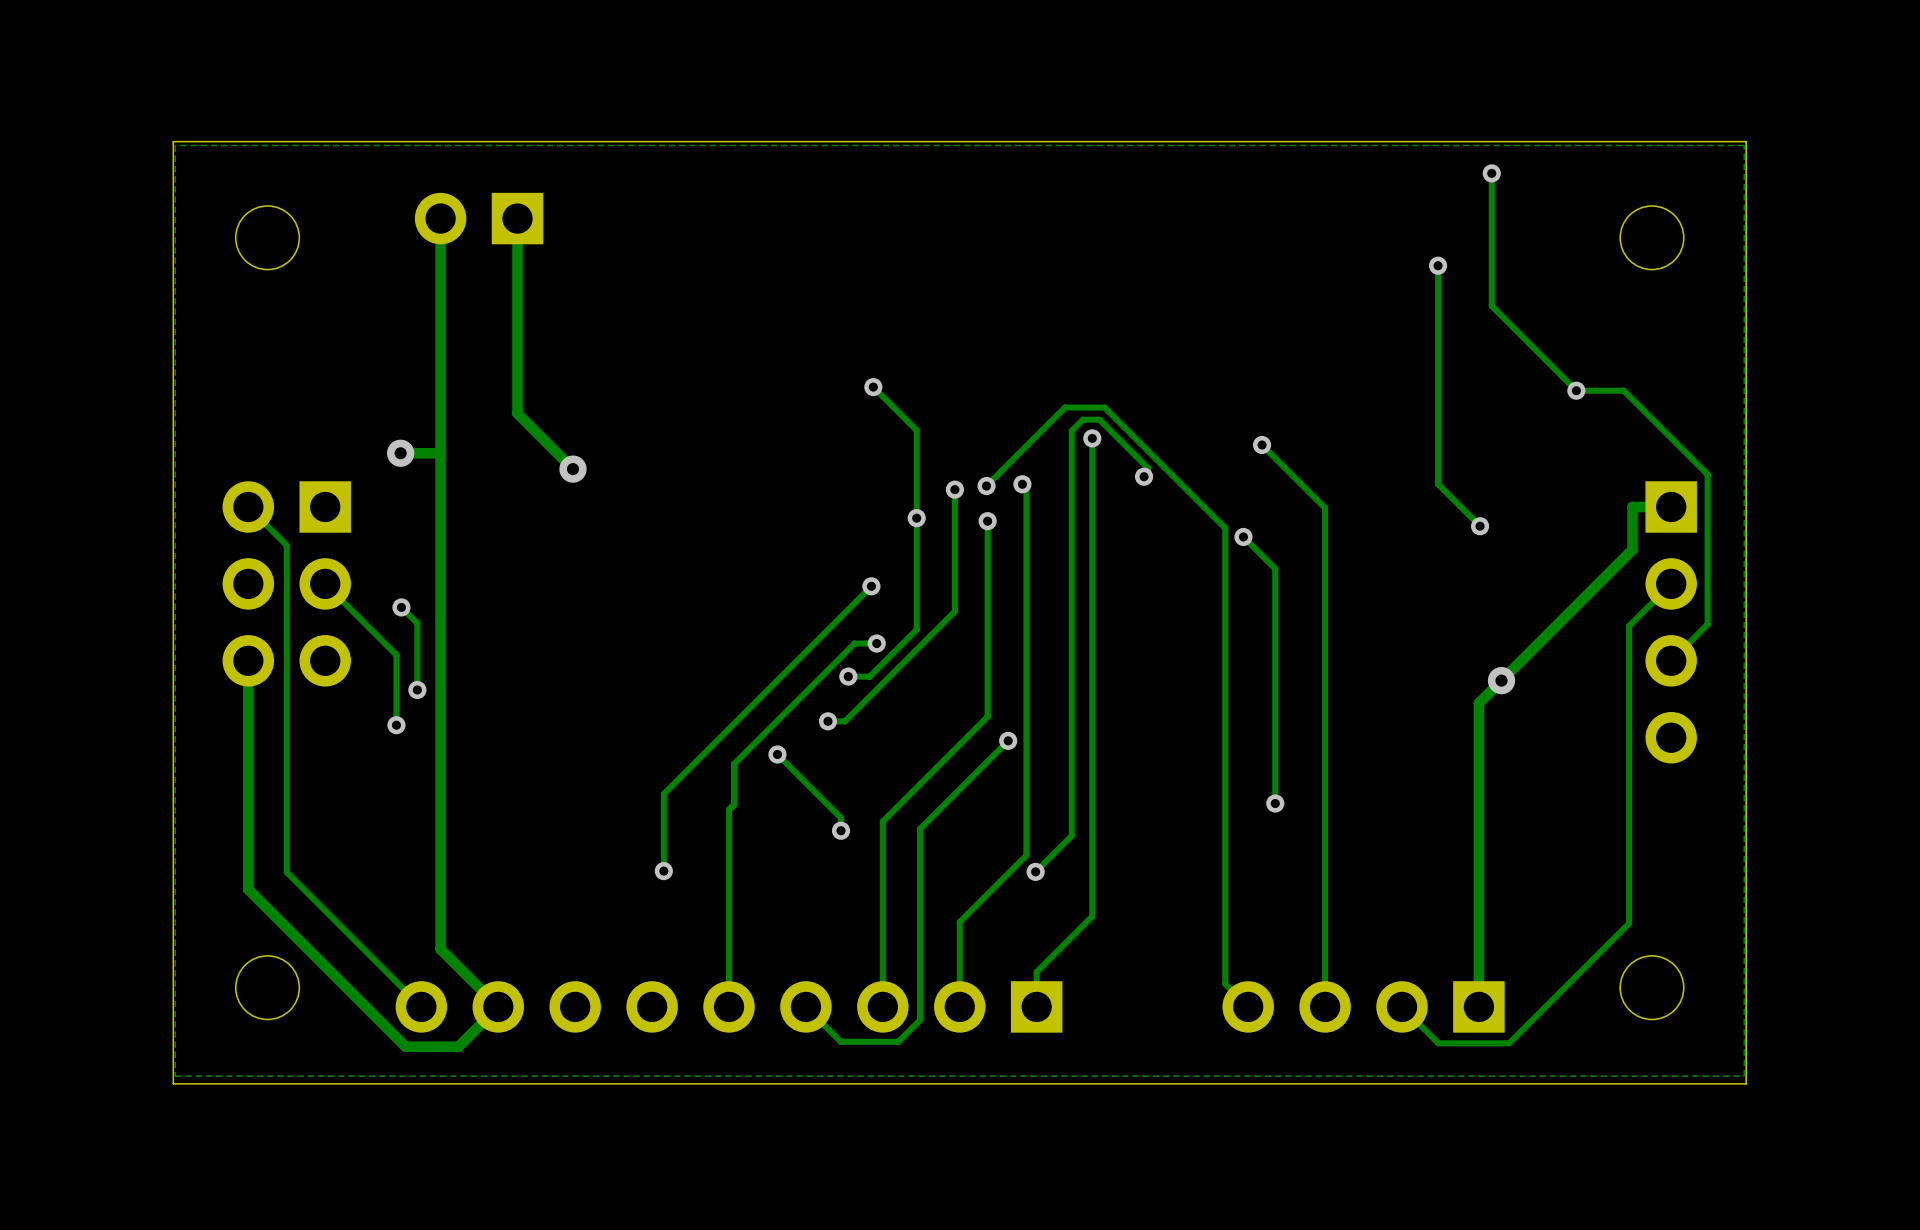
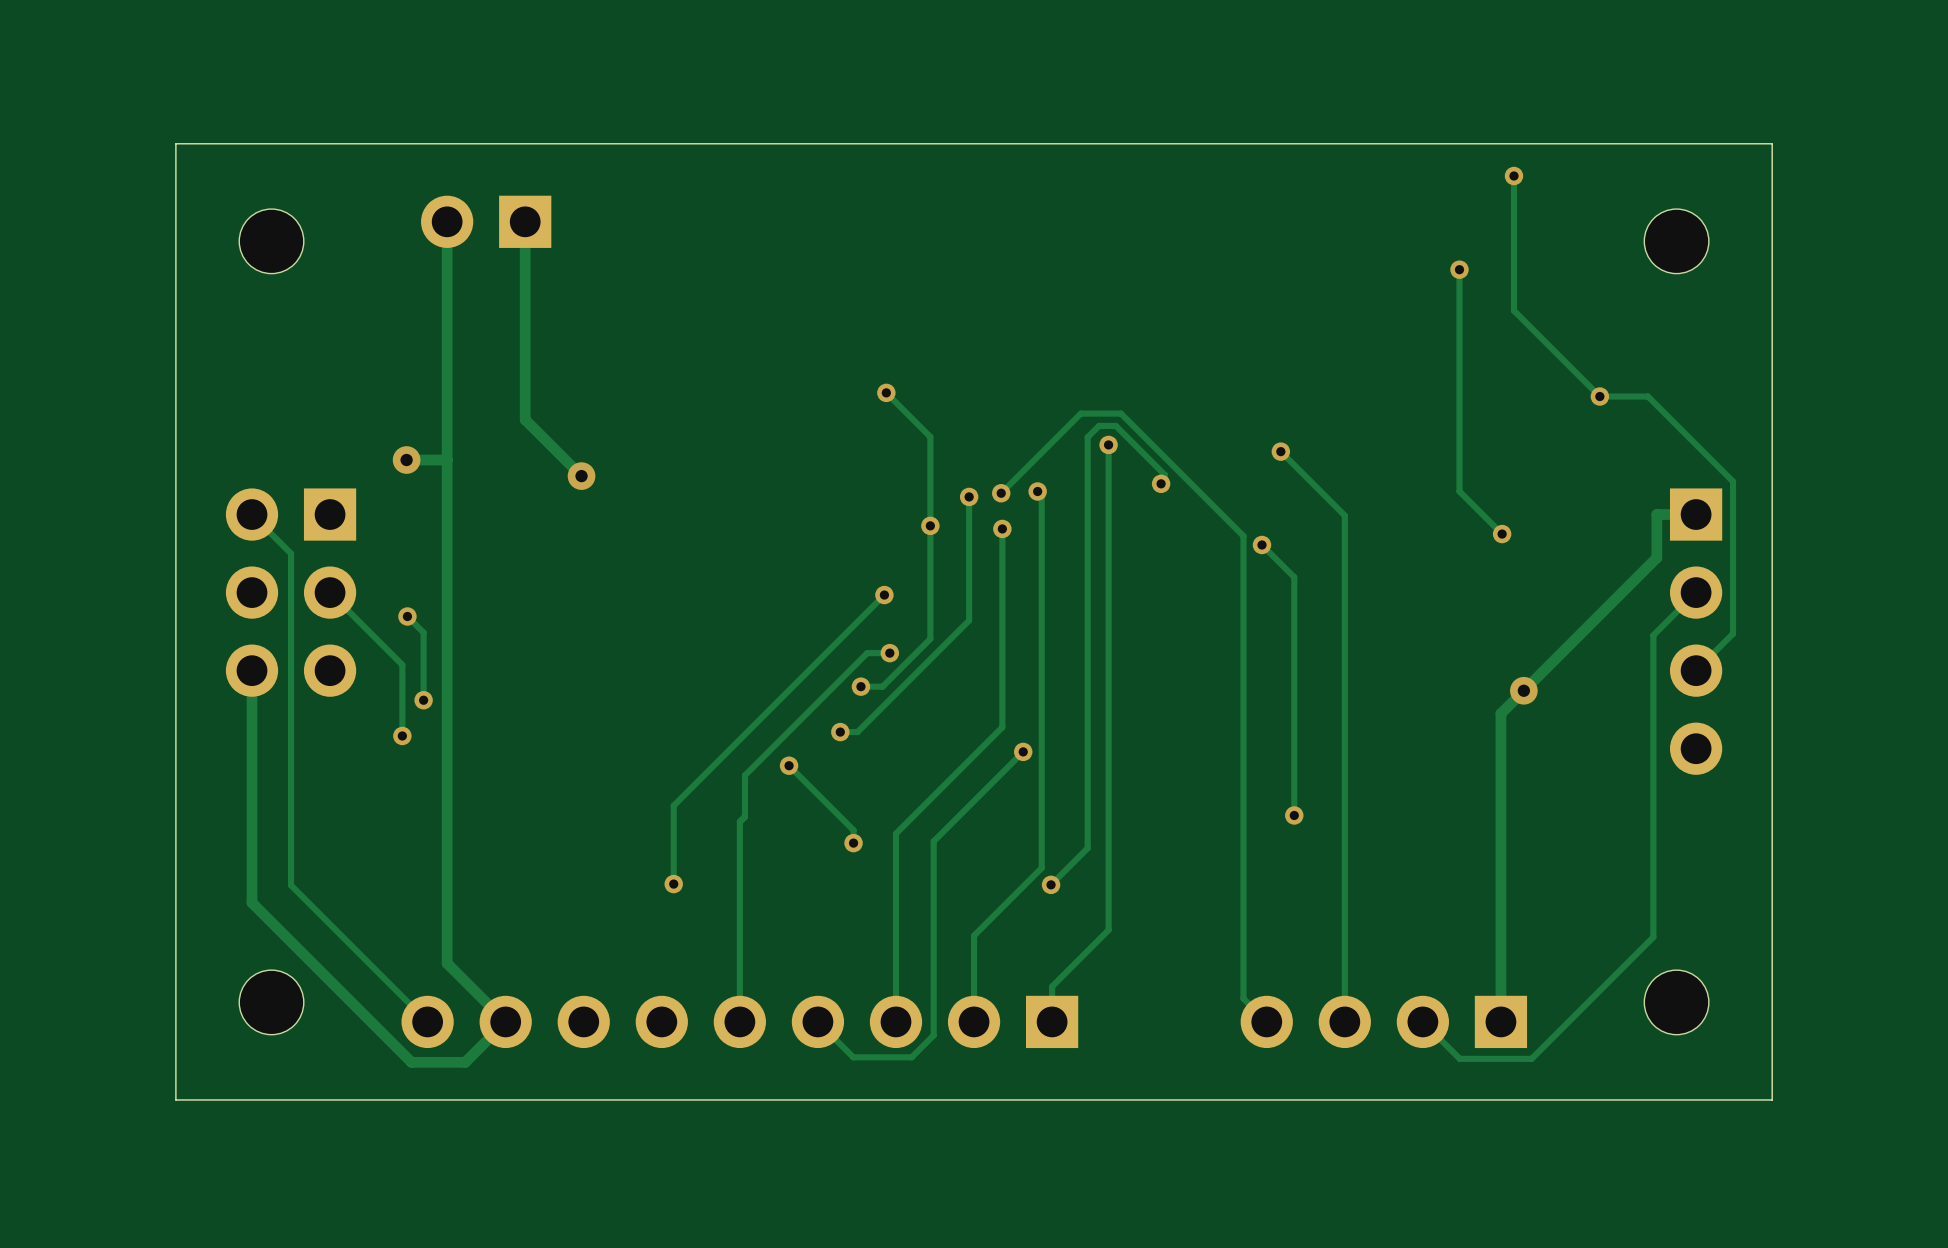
zone outline: (1744, 145) (1744, 1076) (175, 1076) (175, 145) (1744, 145) -> none

